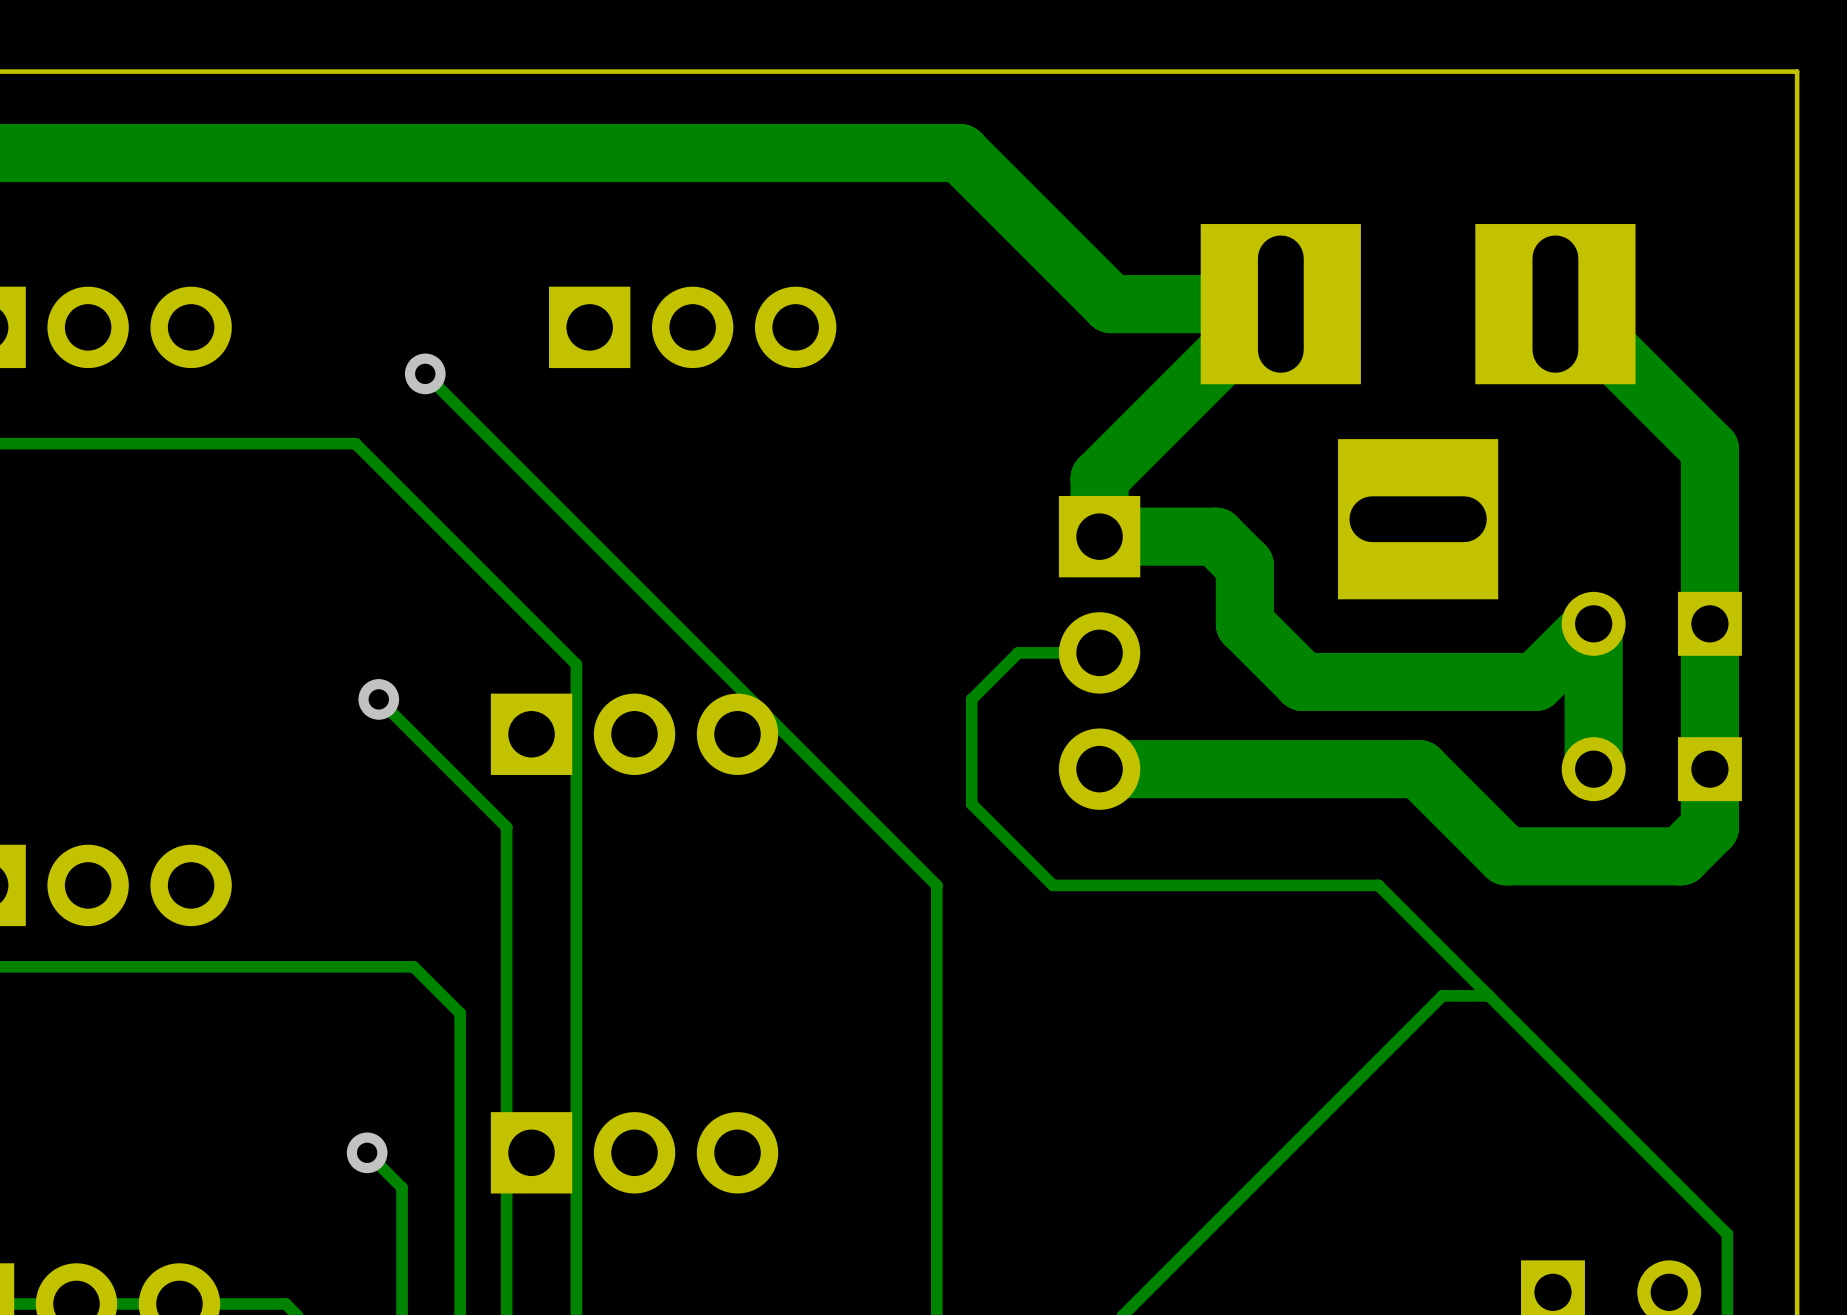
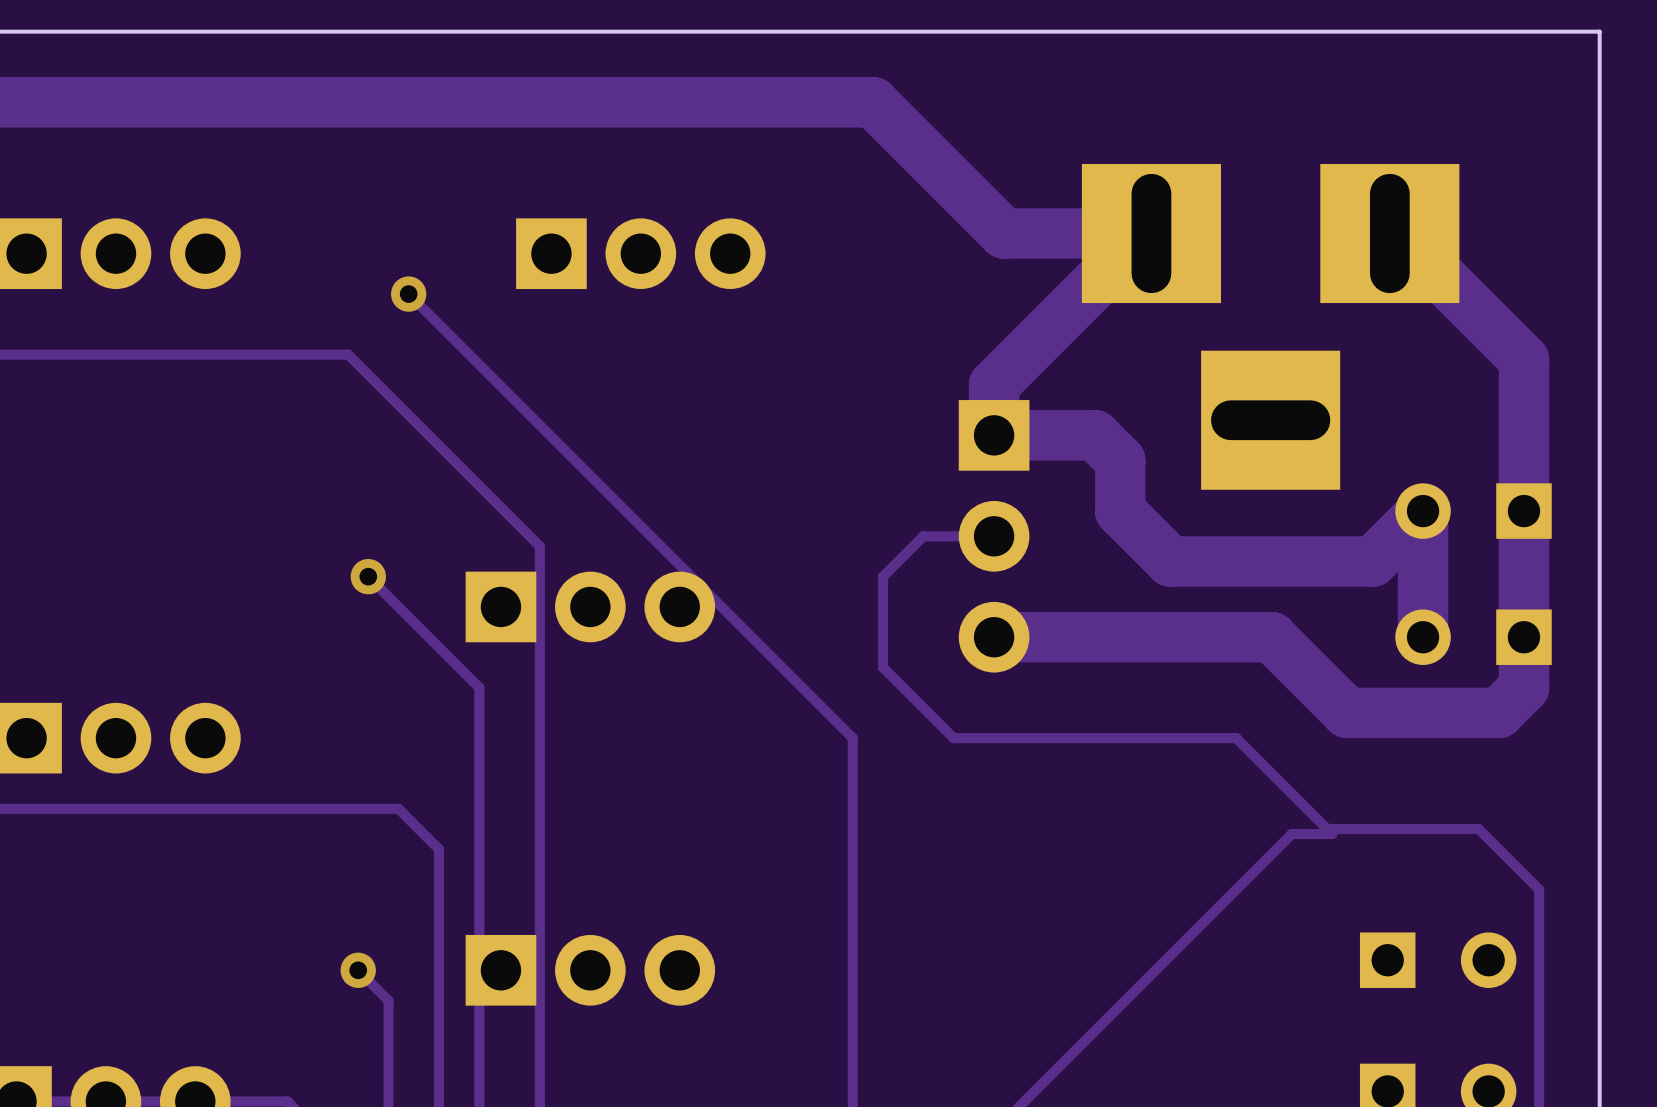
track: (1489, 995) (1727, 1234) -> (1327, 834) (1327, 829) (1478, 829) (1539, 889) (1539, 1040)
part: none -> (1438, 960)

